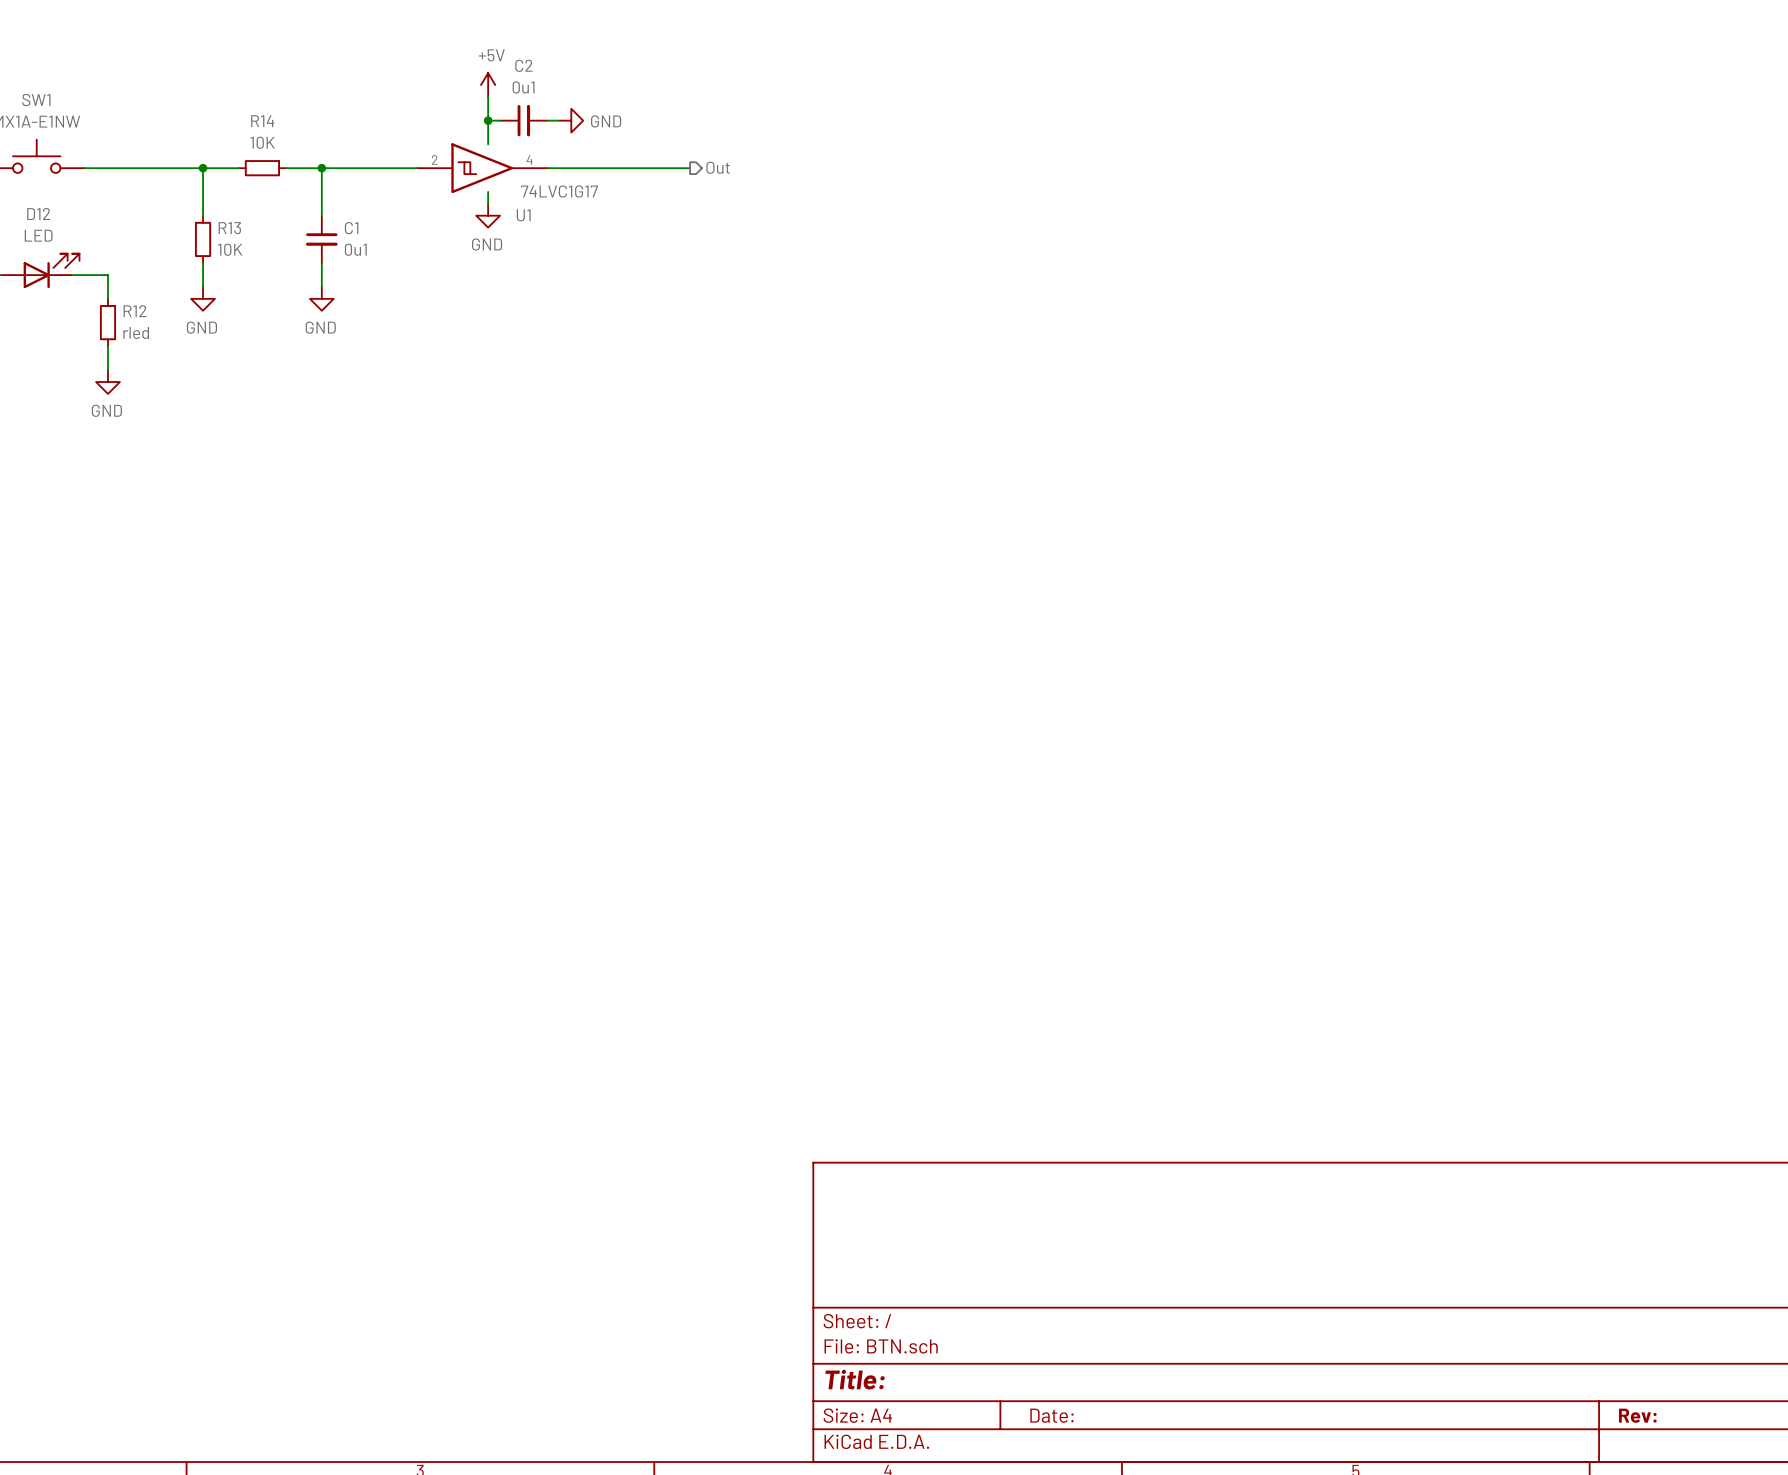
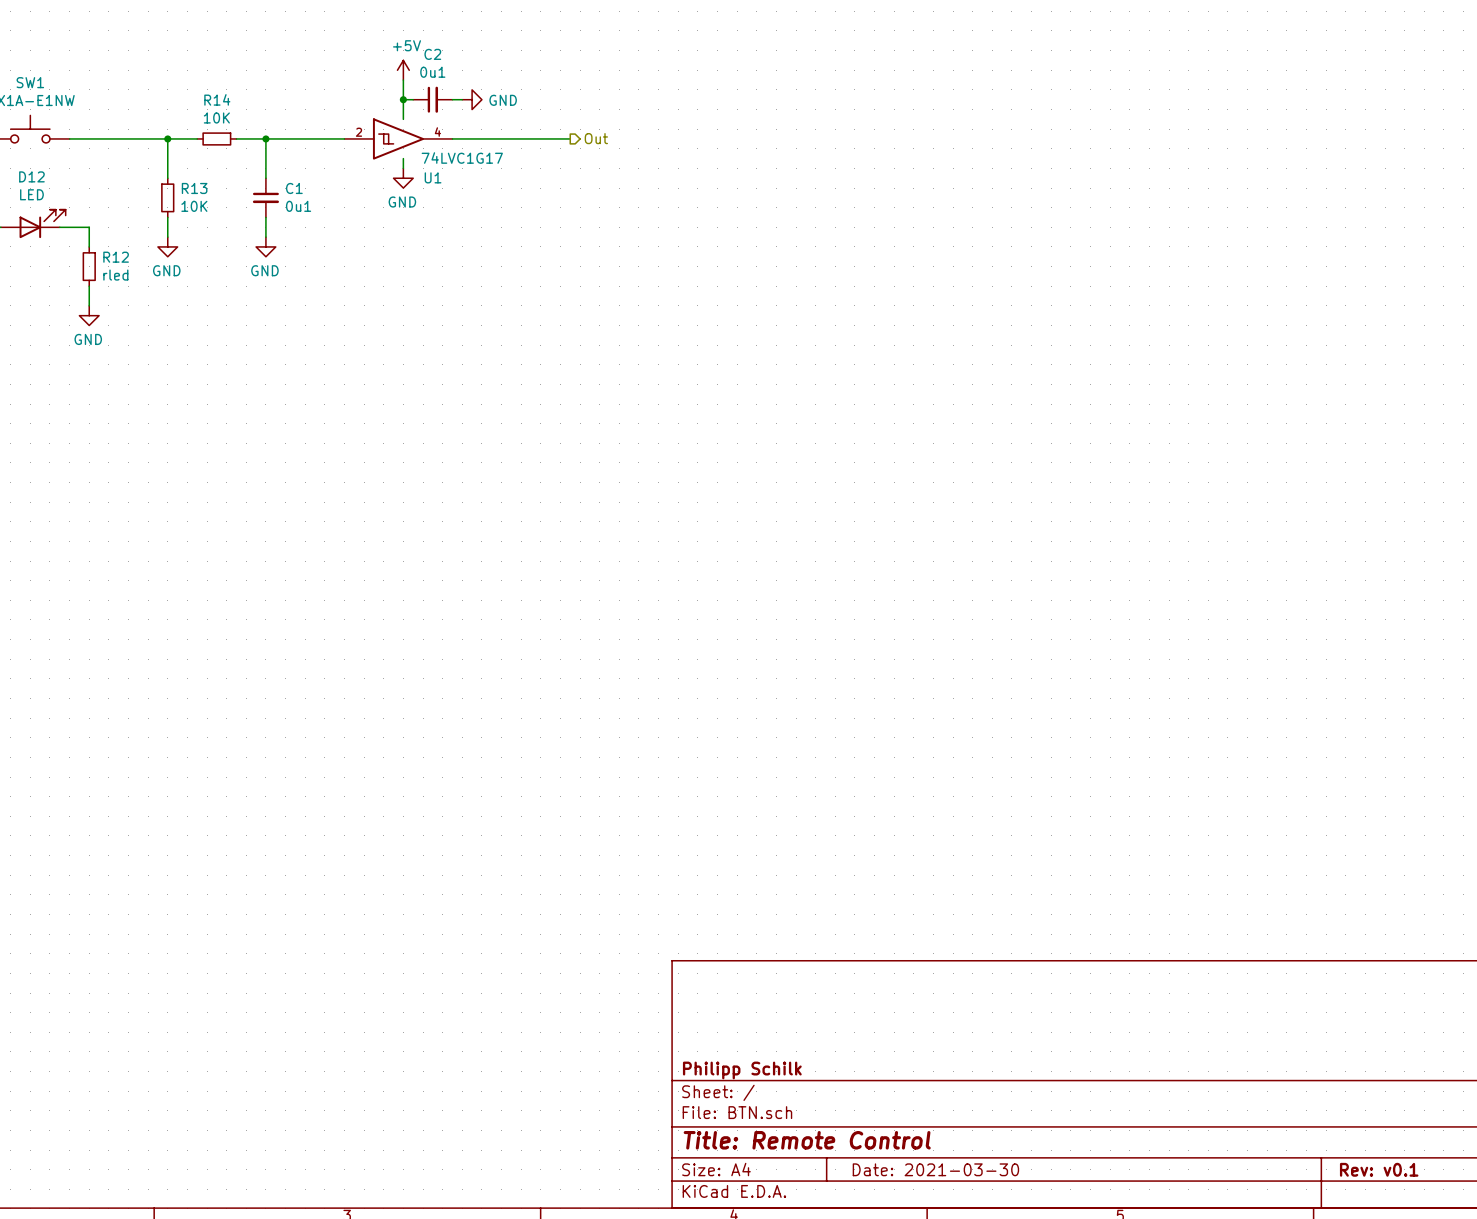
title block: none -> Philipp Schilk (742, 1070)
title block: Title: (855, 1379) -> Title: Remote Control (807, 1140)
title block: Date: (1051, 1415) -> Date: 2021-03-30 (935, 1169)
title block: Rev: (1637, 1415) -> Rev: v0.1 (1379, 1169)

